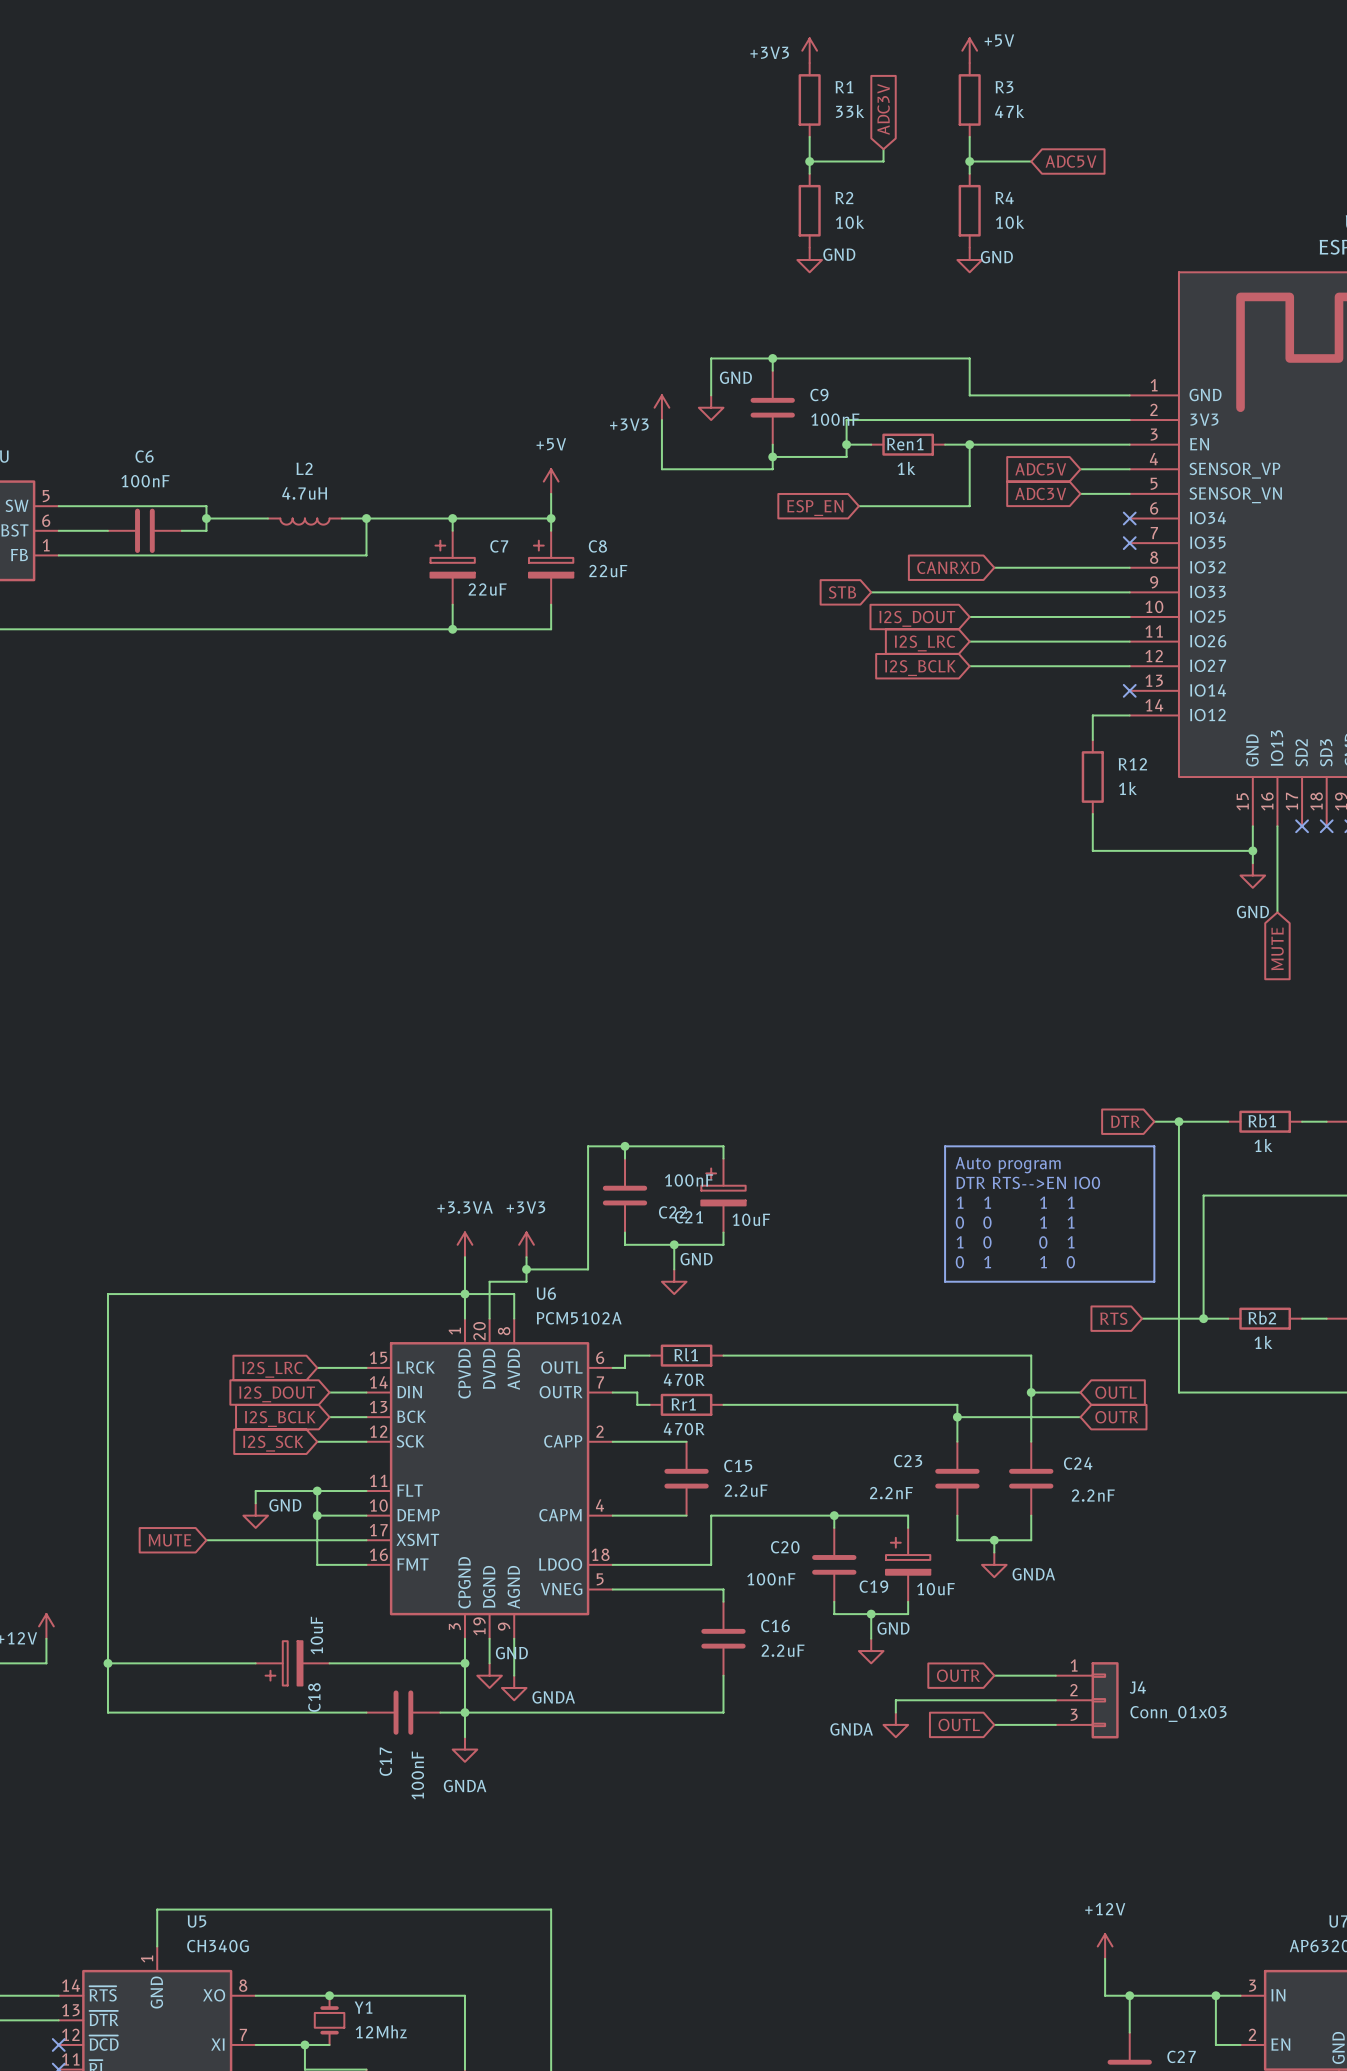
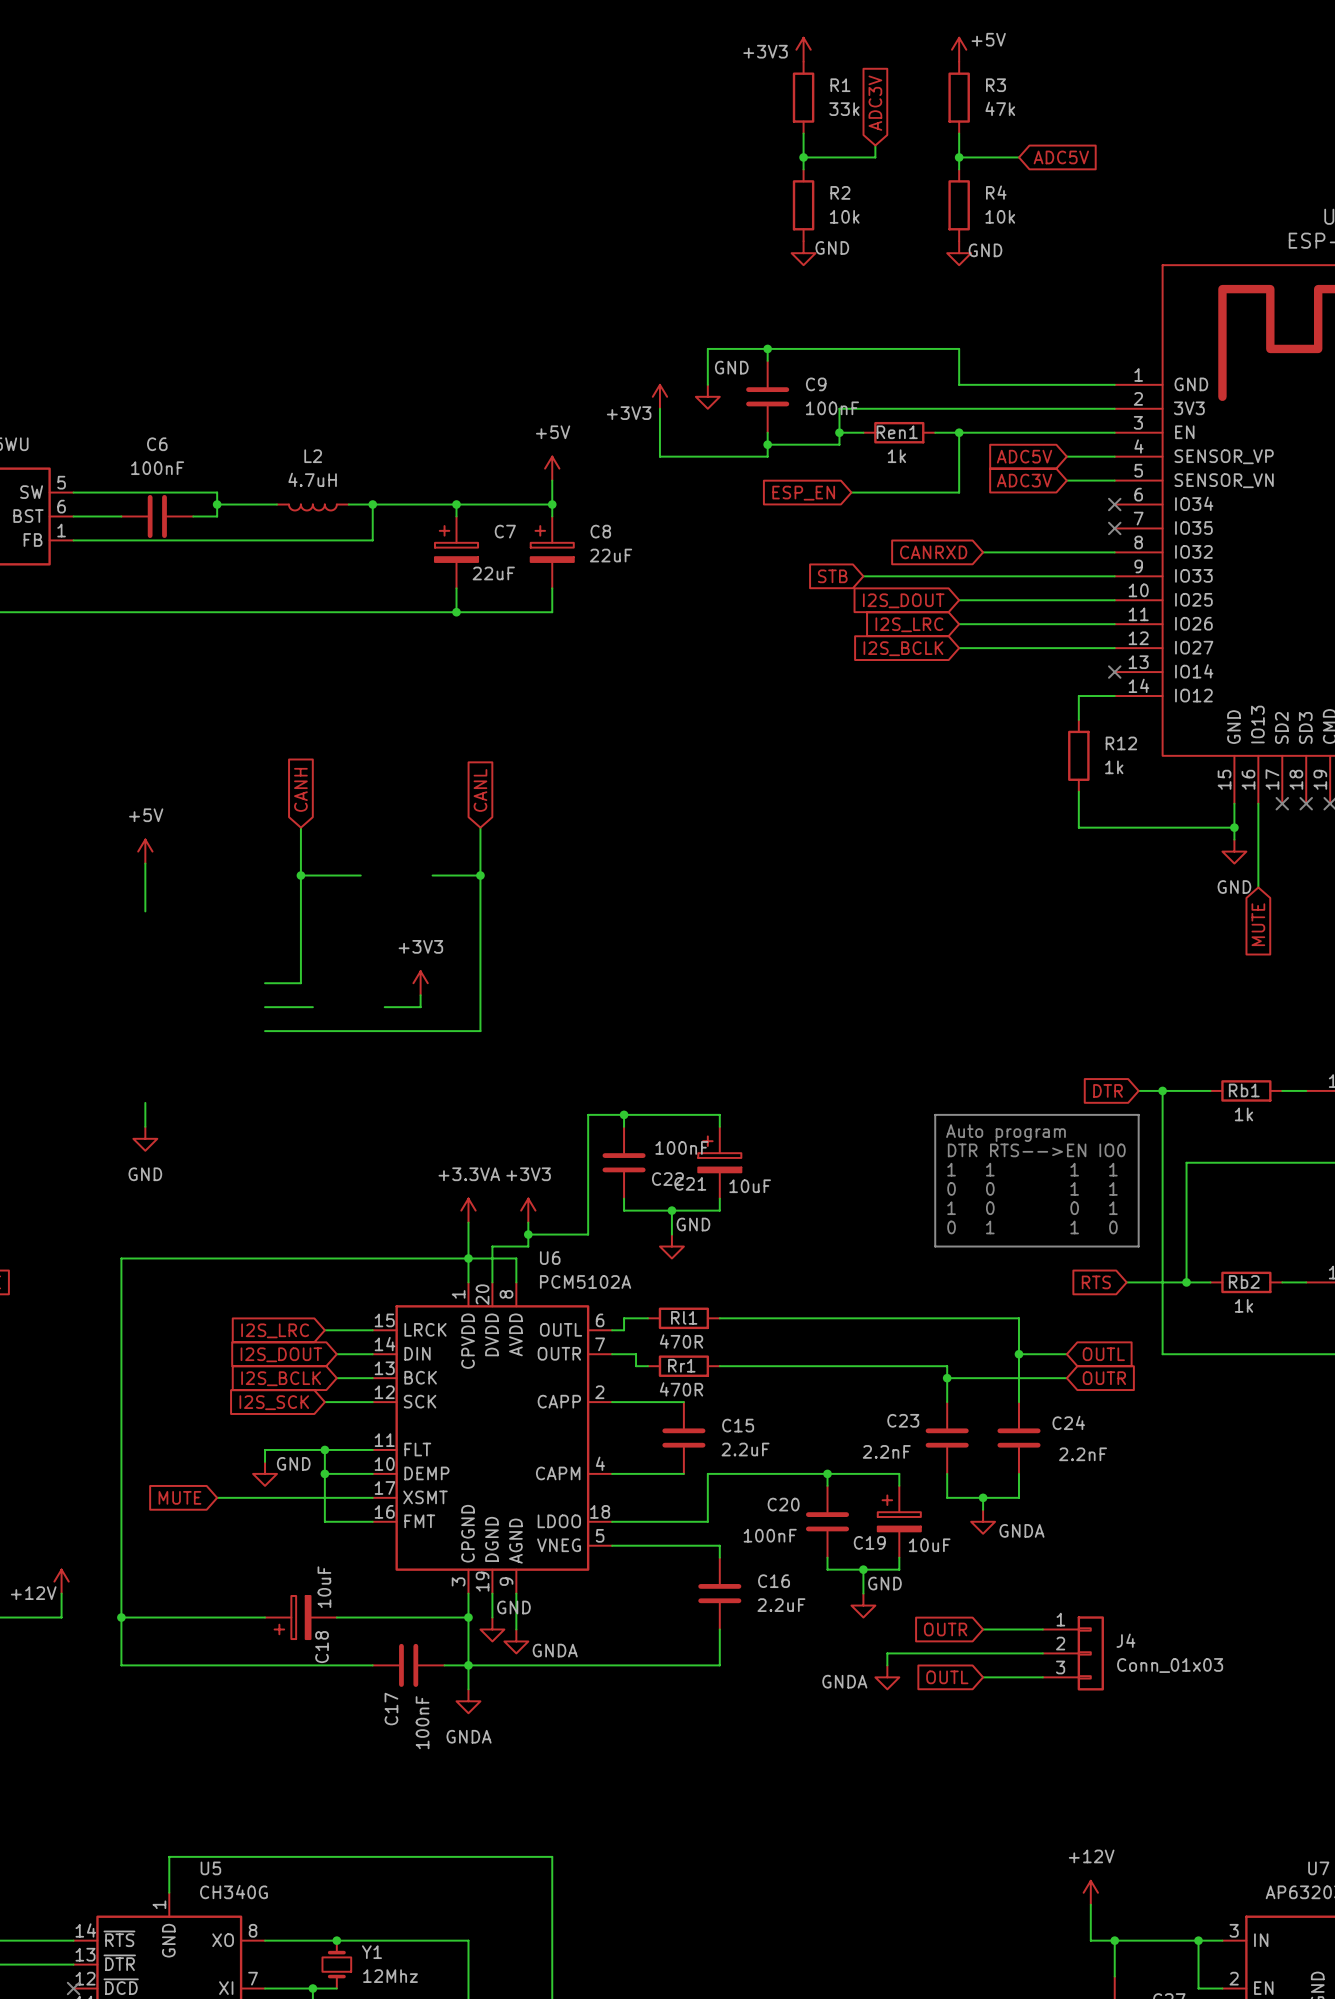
global label: none -> CANH (300, 789)
global label: none -> CANL (480, 790)
wire: none -> (300, 827) (300, 983) (265, 983)
wire: none -> (480, 827) (480, 1031) (265, 1031)
power symbol: none -> +5V (145, 851)
wire: none -> (145, 863) (145, 911)
wire: none -> (300, 875) (360, 875)
junction: none -> (300, 875)
wire: none -> (432, 875) (480, 875)
junction: none -> (480, 875)
power symbol: none -> +3V3 (420, 983)
wire: none -> (420, 995) (420, 1007) (384, 1007)
wire: none -> (265, 1007) (312, 1007)
wire: none -> (145, 1102) (145, 1126)
power symbol: none -> GND (145, 1138)

